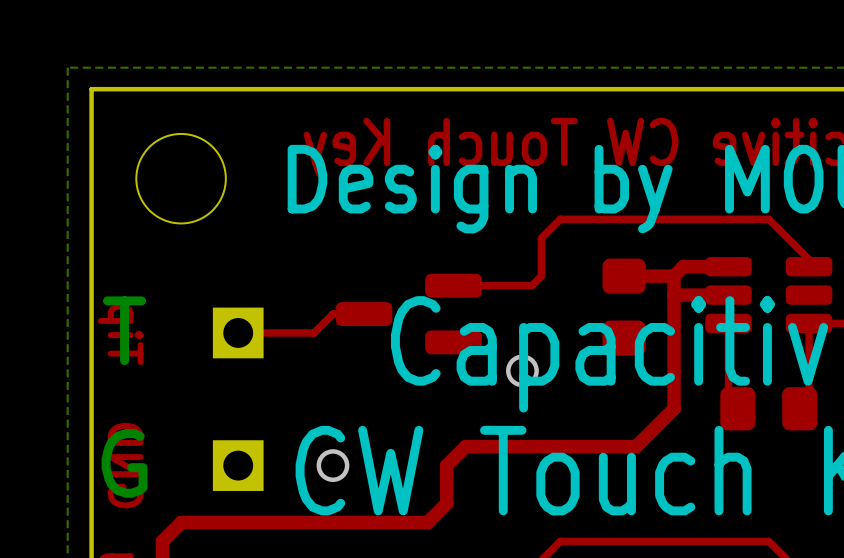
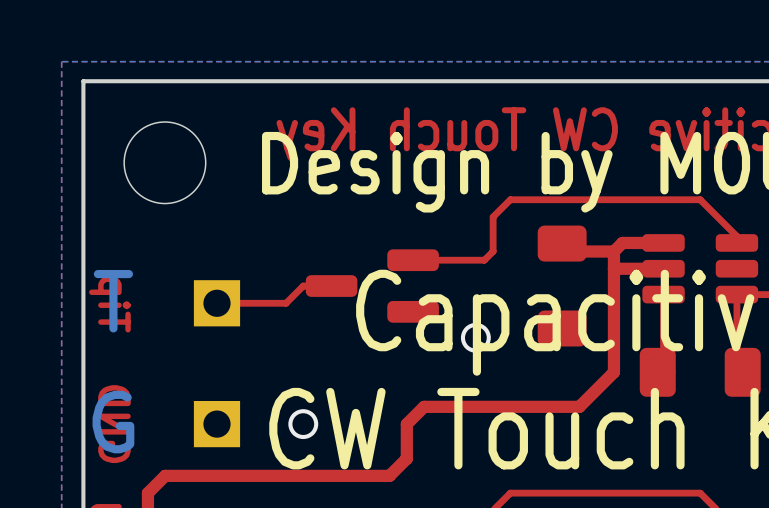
part footprint: [602, 258, 646, 356] -> [537, 225, 587, 347]
part footprint: [720, 387, 818, 431] -> [639, 347, 761, 397]

